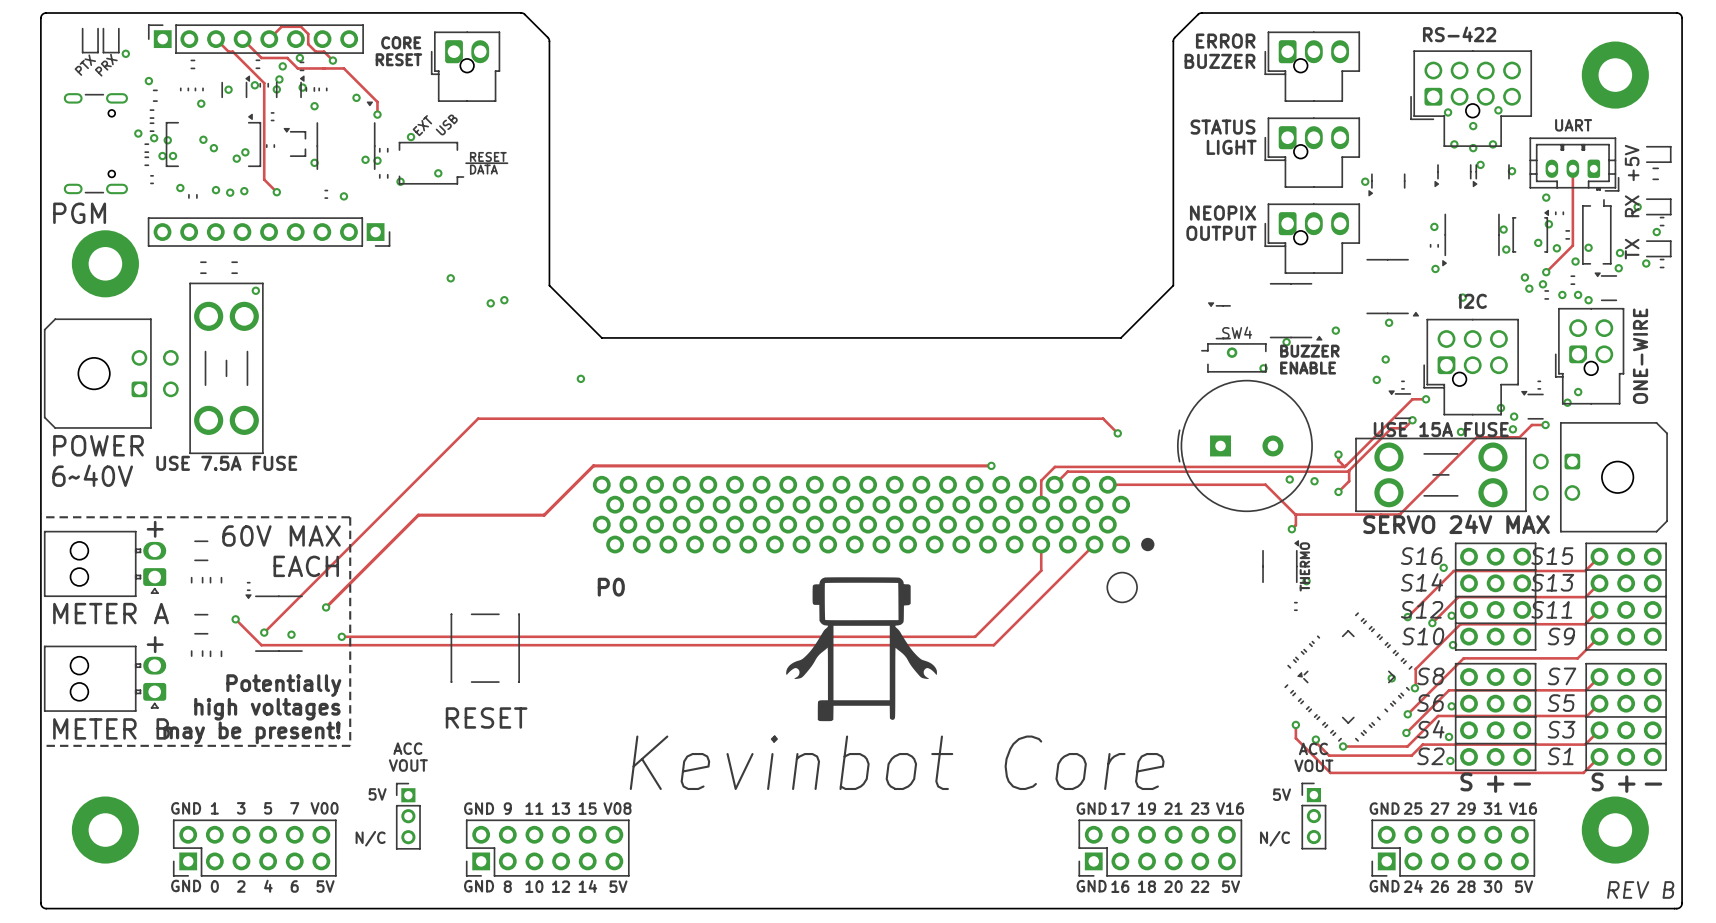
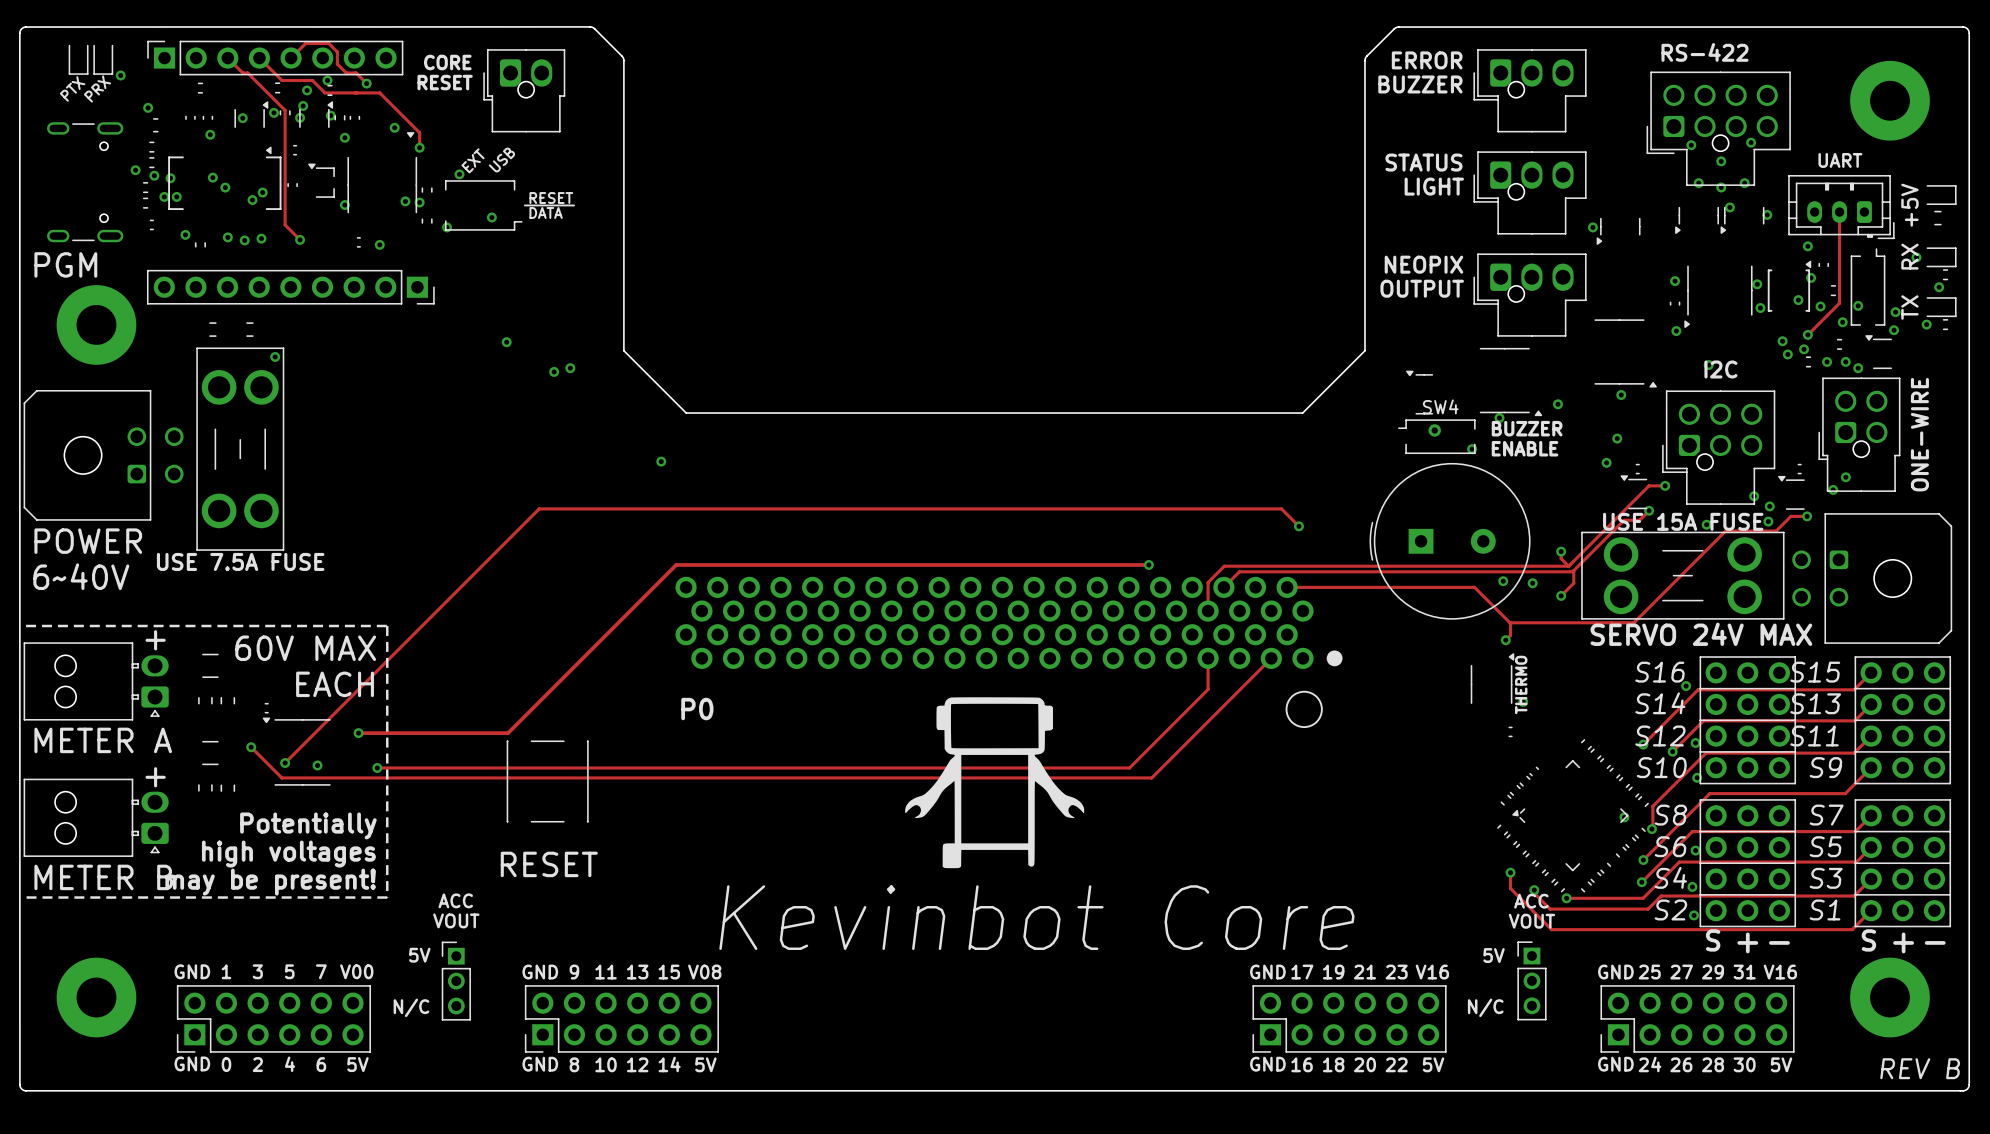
track: (544, 515) (418, 515) (326, 607) -> (617, 623) (508, 733) (358, 733)

